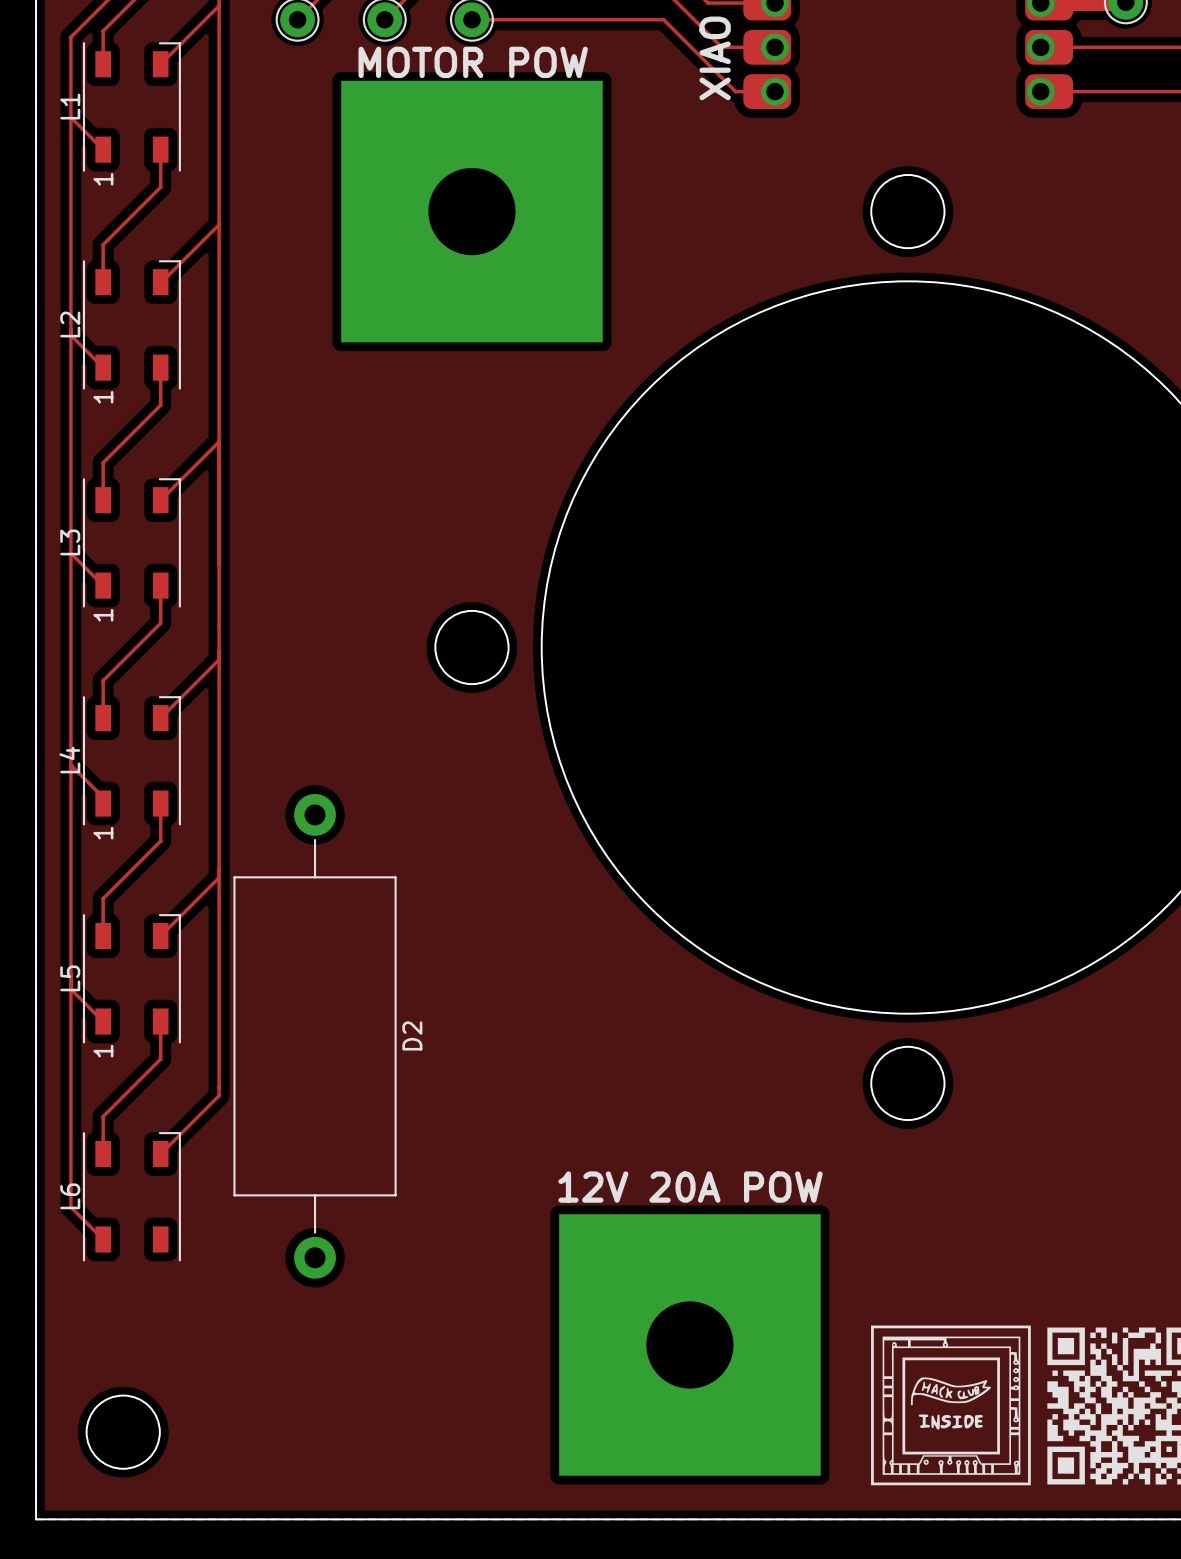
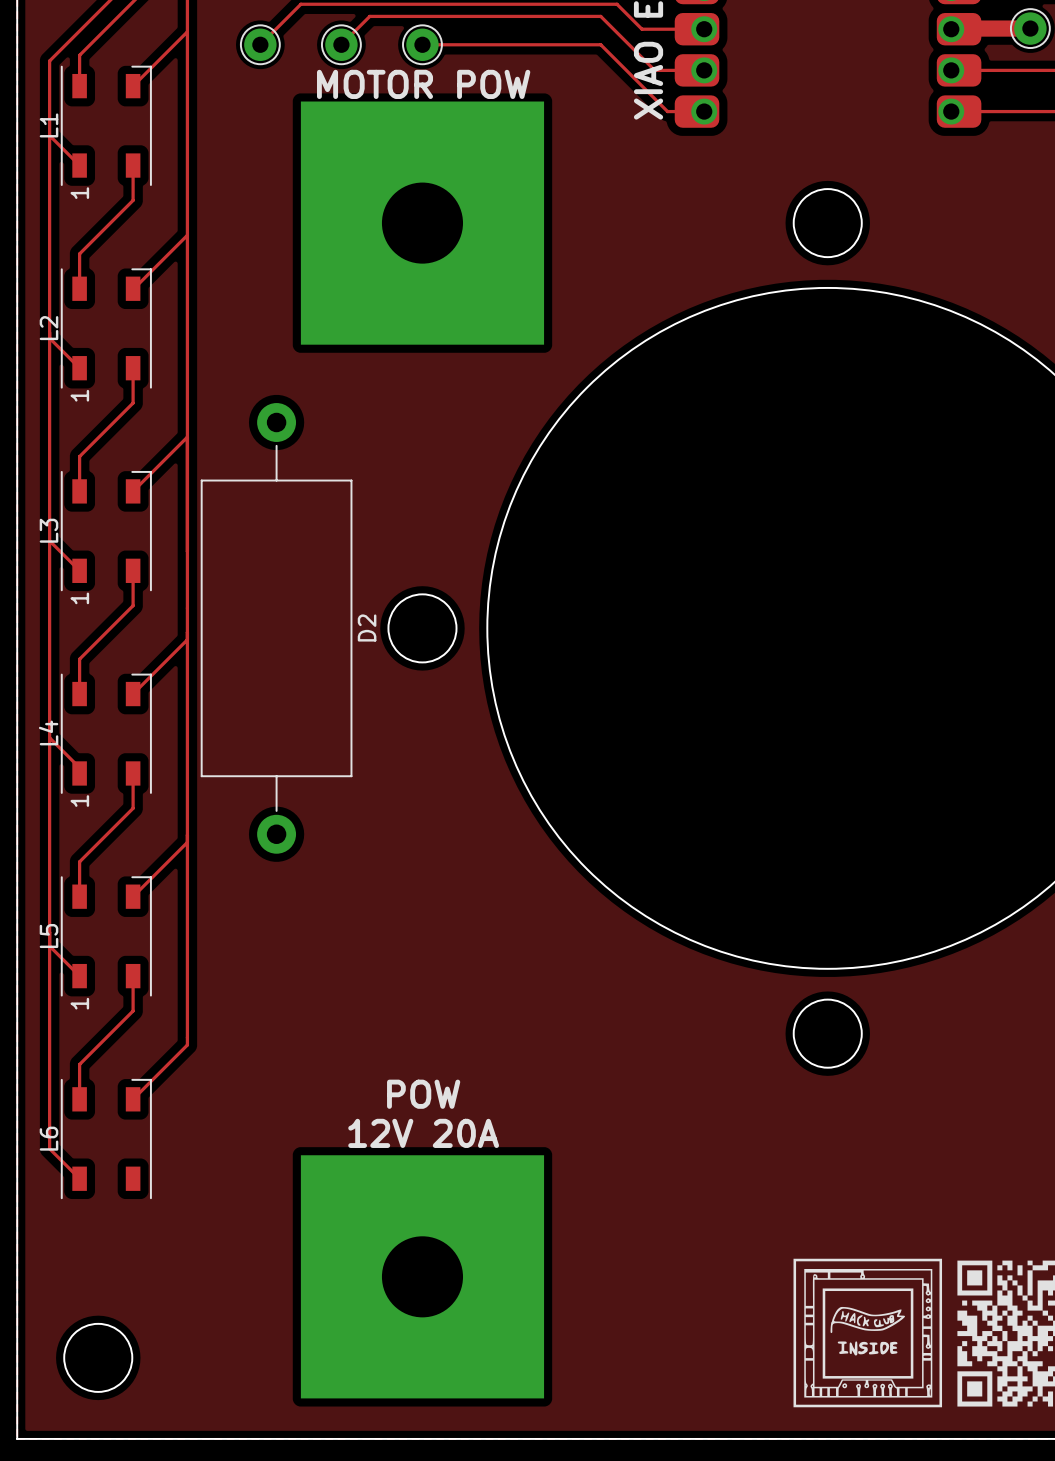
D2 position: (315, 1036) -> (276, 628)
text: none -> POW (423, 1094)
text: 12V 20A POW (690, 1187) -> 12V 20A (423, 1133)
part position: (689, 1344) -> (422, 1276)

